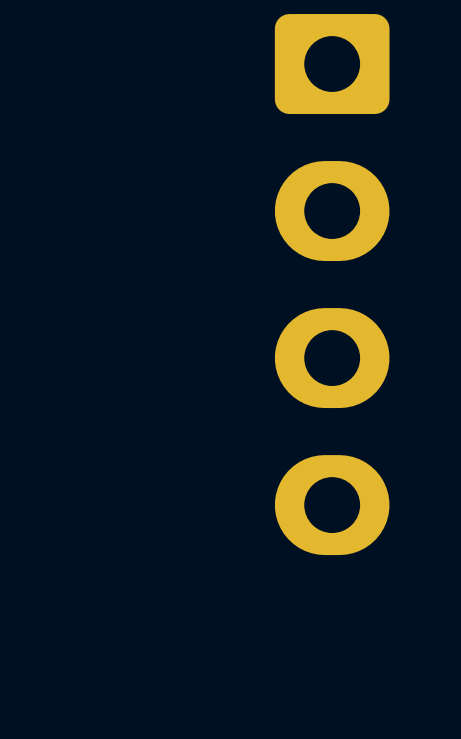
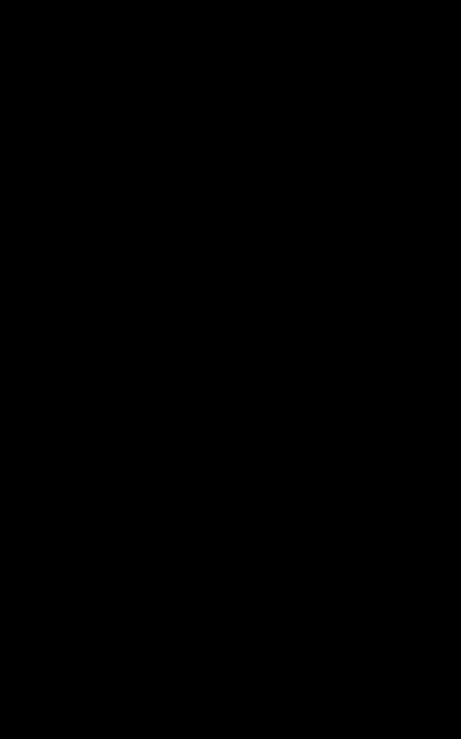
part: (332, 284) -> none

